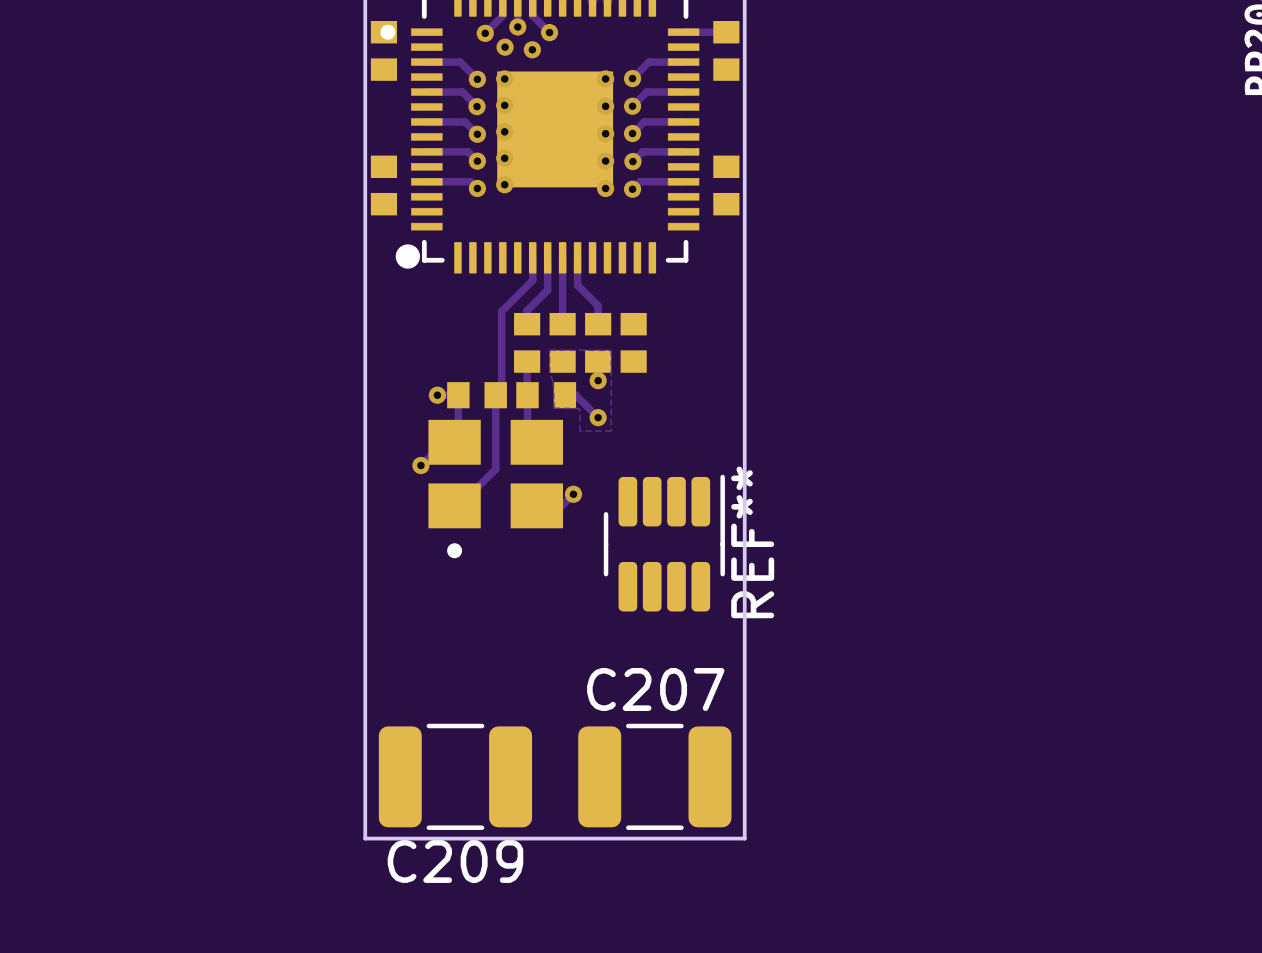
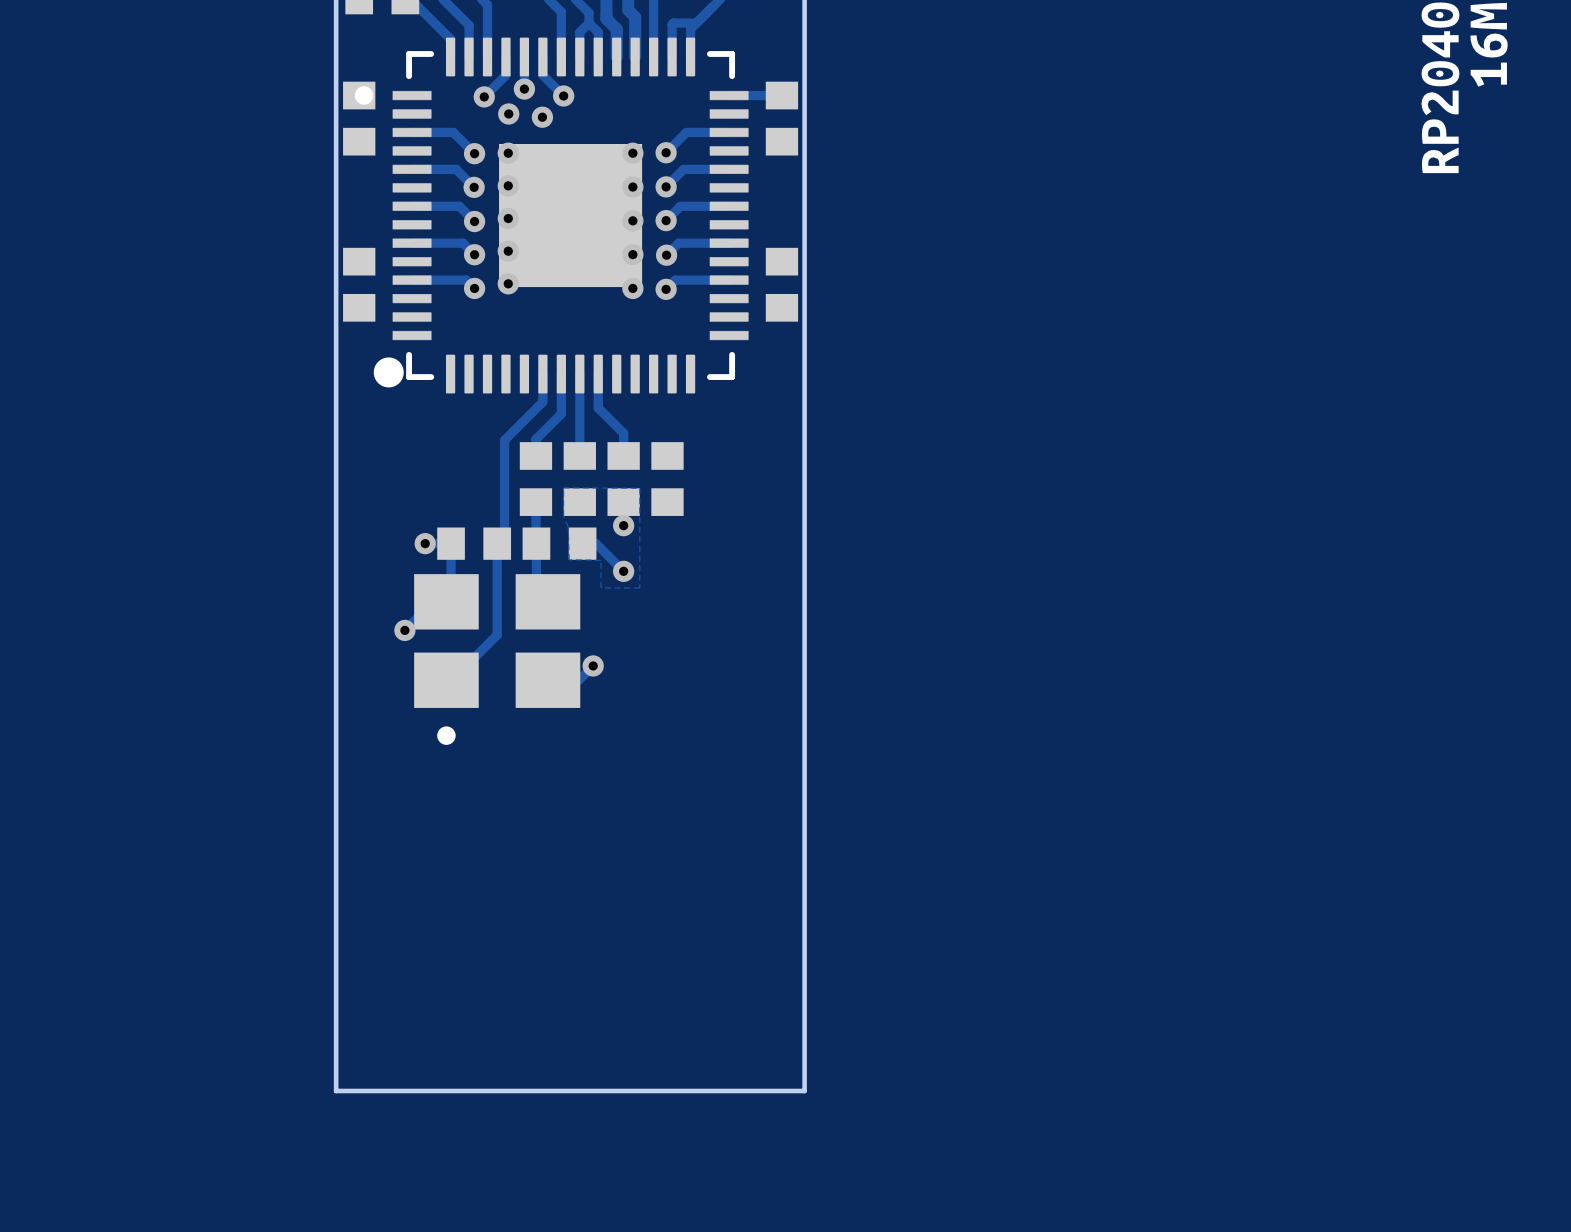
REF**: (664, 543) -> none
C209: (455, 776) -> none
C207: (654, 776) -> none

